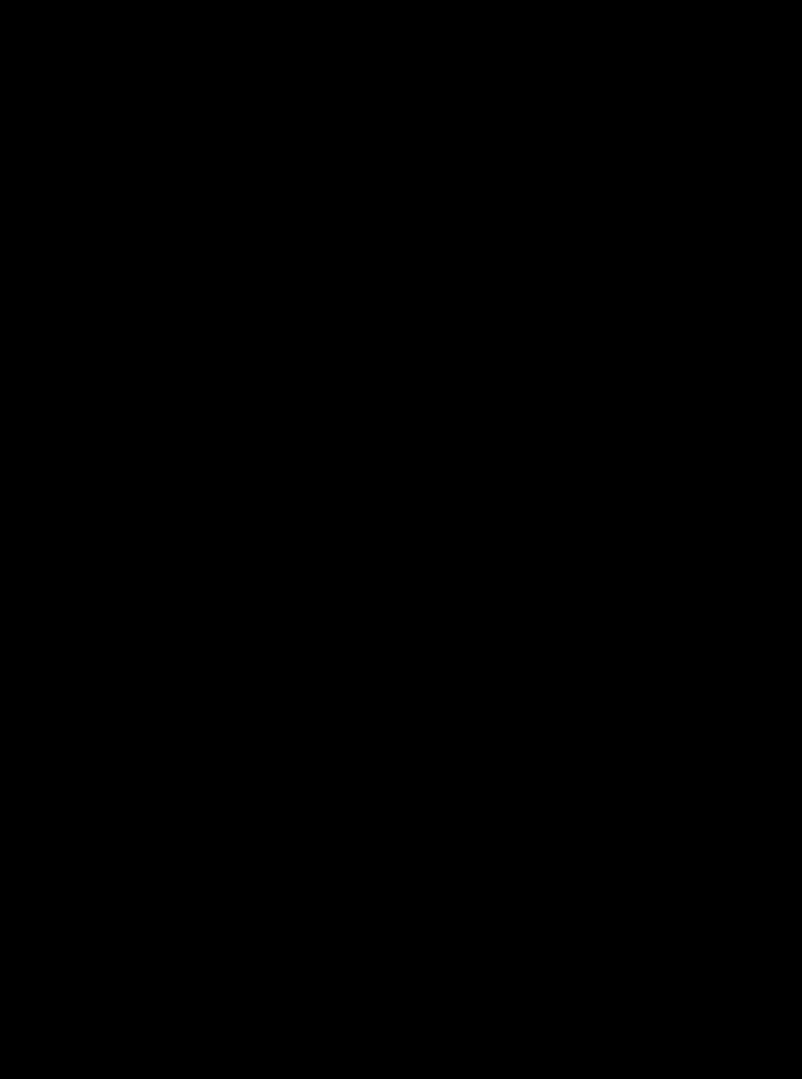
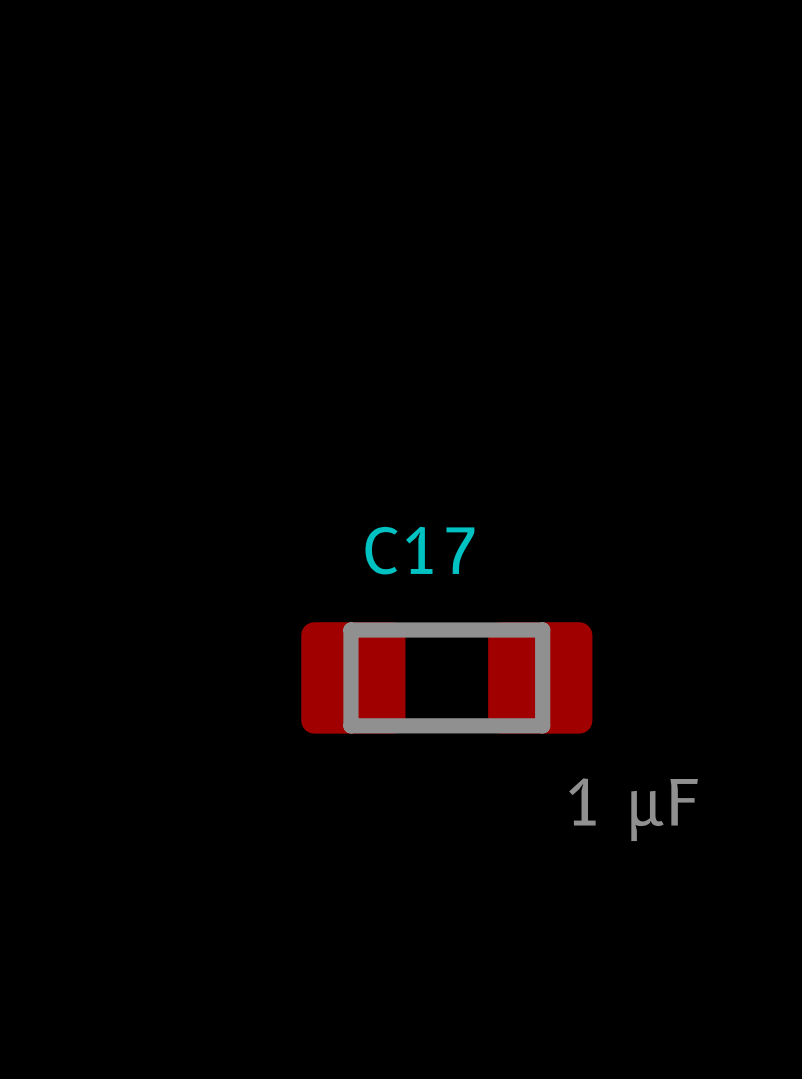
C17: none -> 1 µF (446, 677)

